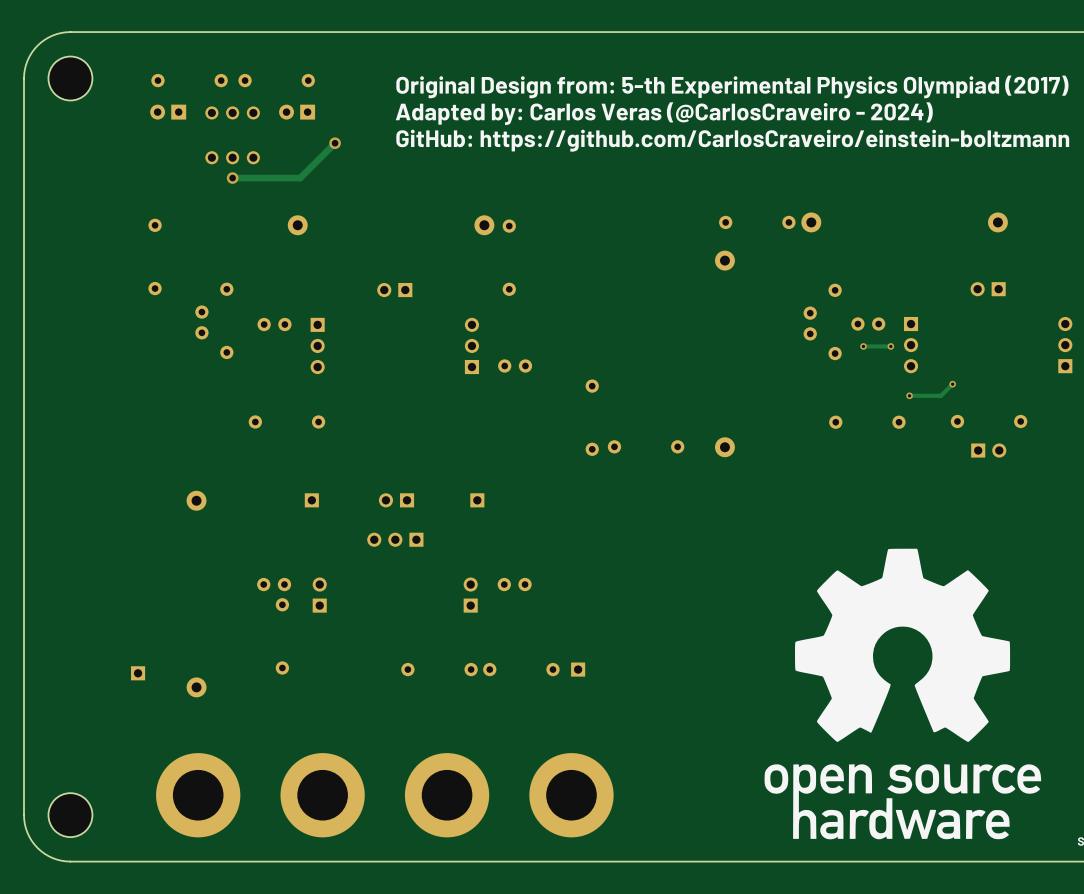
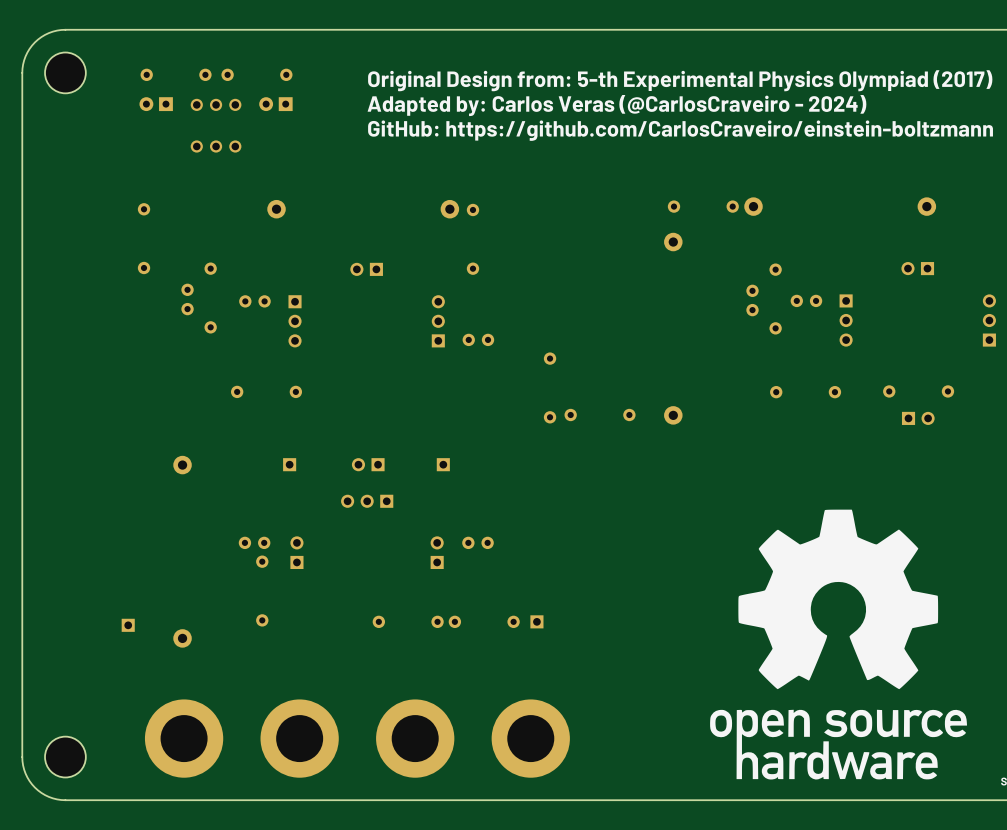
track: (335, 143) (300, 178) (232, 178) -> none
via: (335, 143) -> none
via: (232, 178) -> none
via: (863, 346) -> none
track: (890, 346) (863, 346) -> none
via: (890, 346) -> none
track: (952, 384) (941, 395) (909, 395) -> none
via: (952, 384) -> none
via: (909, 395) -> none

